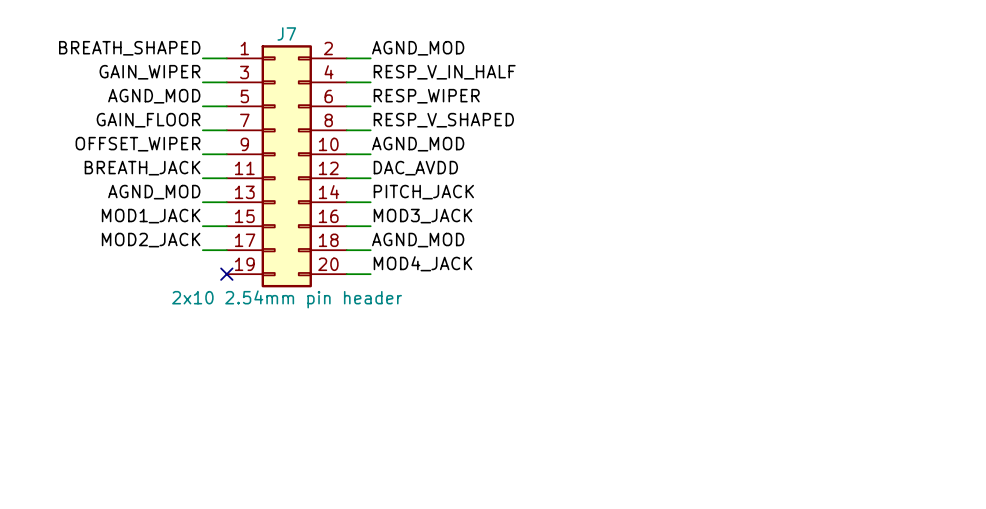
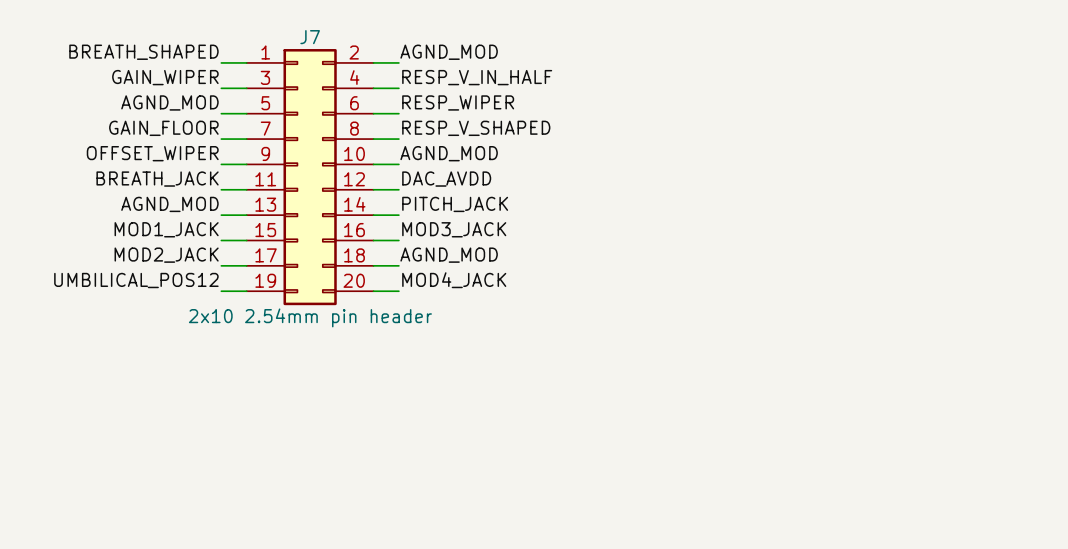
label: none -> UMBILICAL_POS12 (136, 280)
wire: none -> (221, 291) (246, 291)
no-connect mark: (226, 274) -> none

